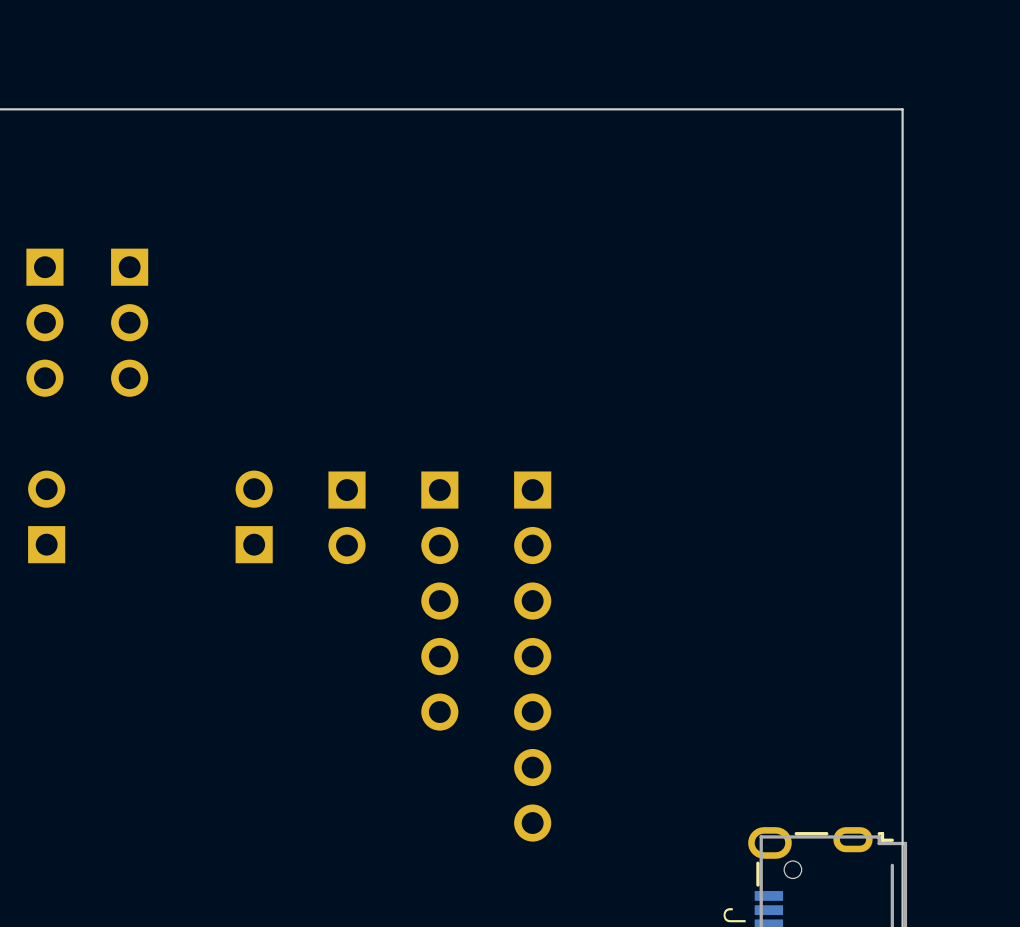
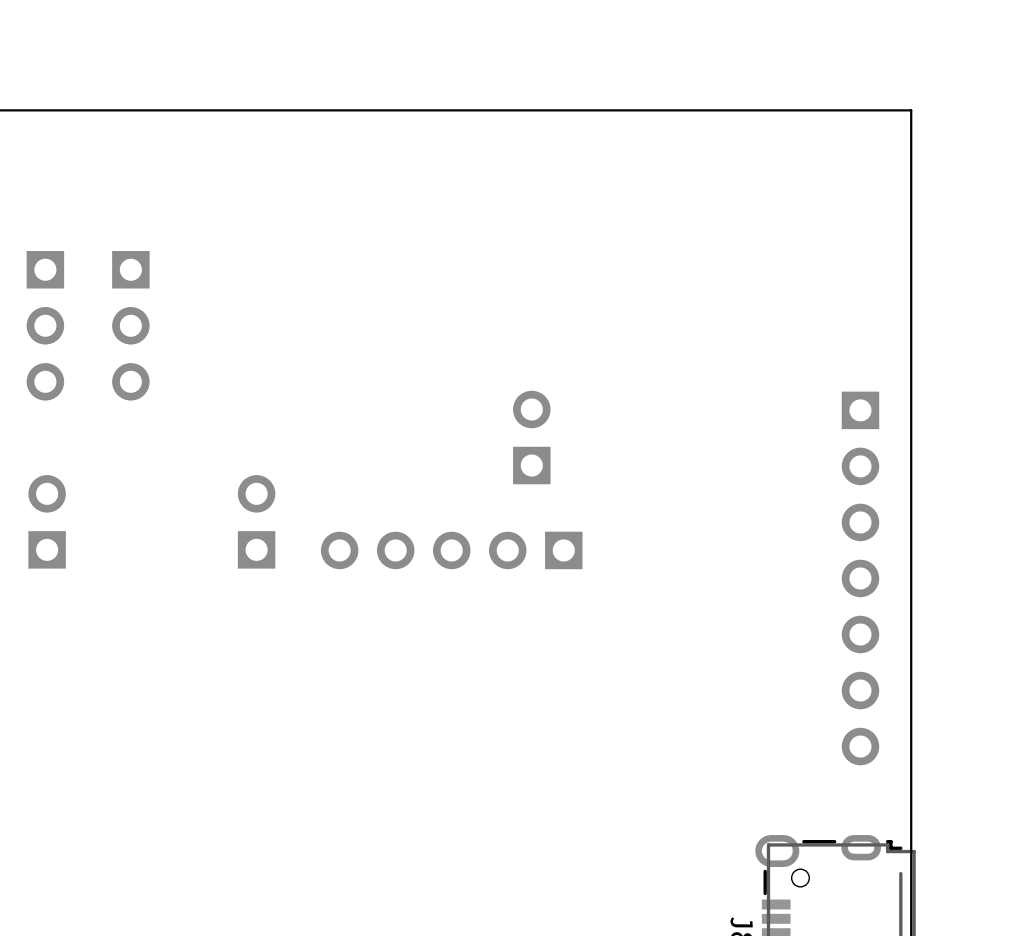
part rotation: 0° (347, 517) -> 180° (531, 437)
part position: (347, 517) -> (531, 437)
part rotation: 0° (439, 601) -> 90° clockwise (451, 550)
part position: (532, 656) -> (860, 578)

